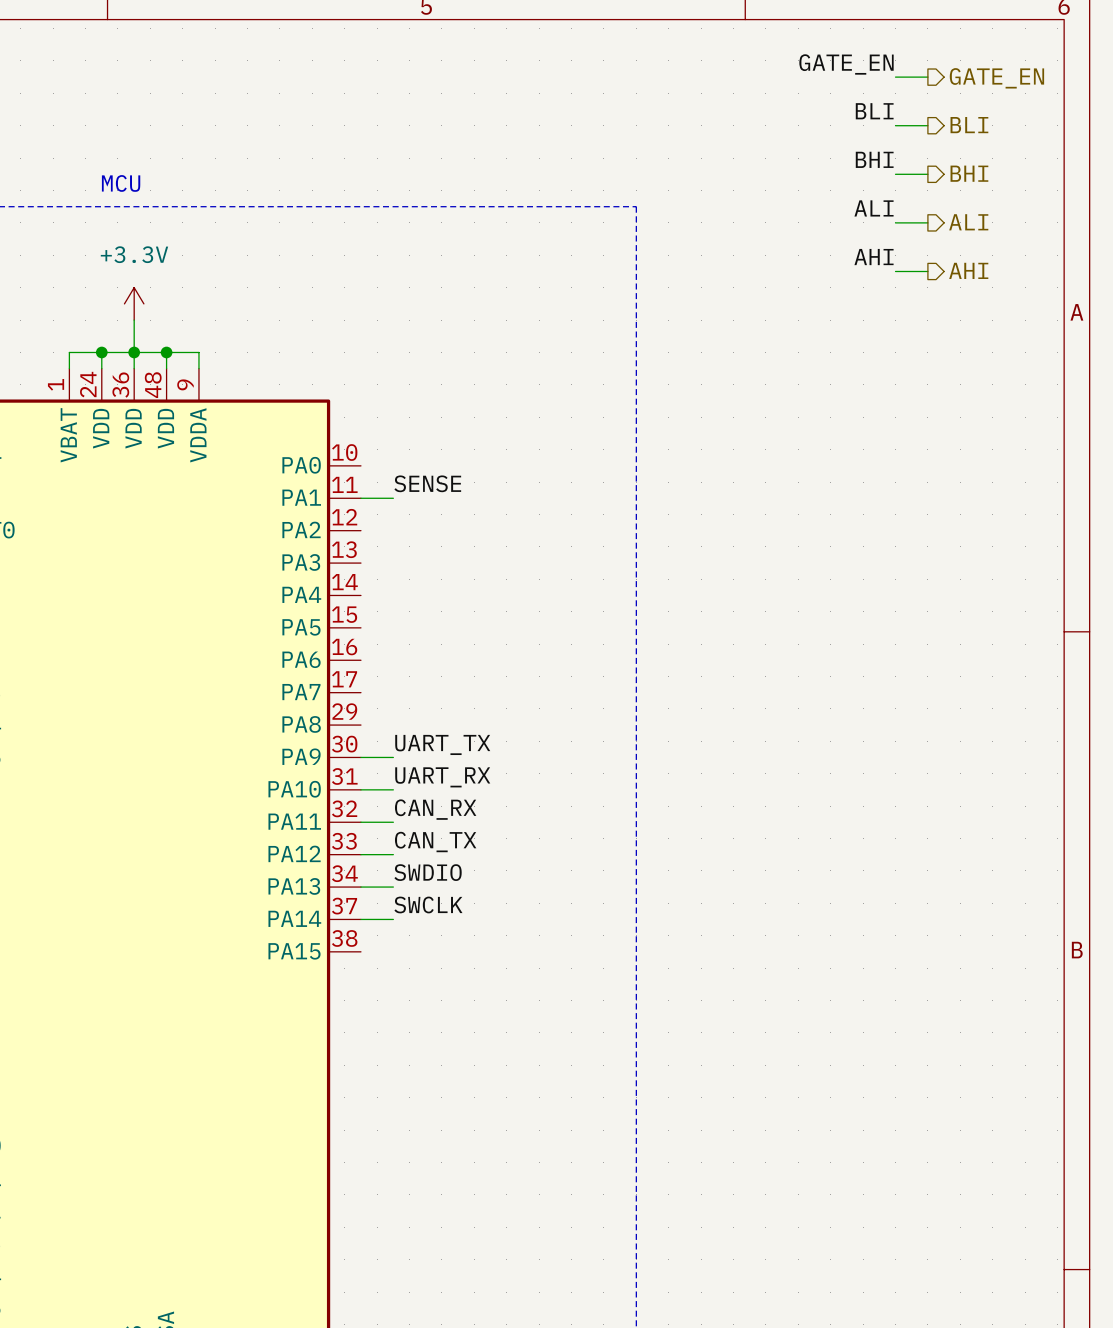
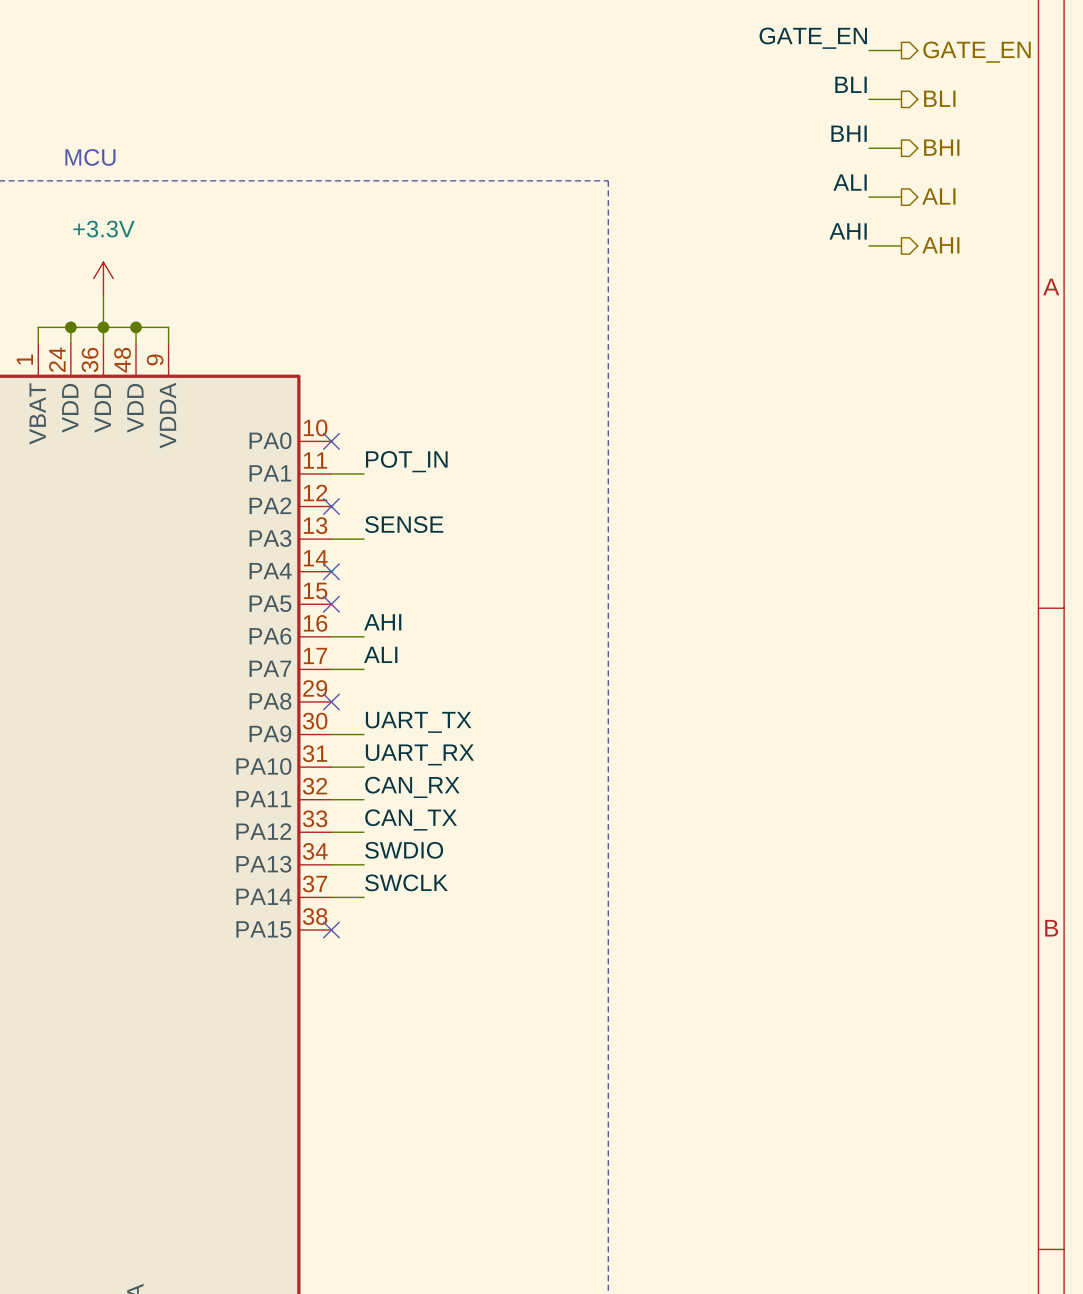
no-connect mark: none -> (331, 441)
label: SENSE (427, 483) -> POT_IN (406, 461)
no-connect mark: none -> (331, 506)
label: none -> SENSE (404, 524)
wire: none -> (331, 539) (364, 539)
no-connect mark: none -> (331, 571)
no-connect mark: none -> (331, 604)
label: none -> AHI (382, 622)
wire: none -> (331, 636) (364, 636)
label: none -> ALI (380, 654)
wire: none -> (331, 669) (364, 669)
no-connect mark: none -> (331, 701)
no-connect mark: none -> (331, 929)

